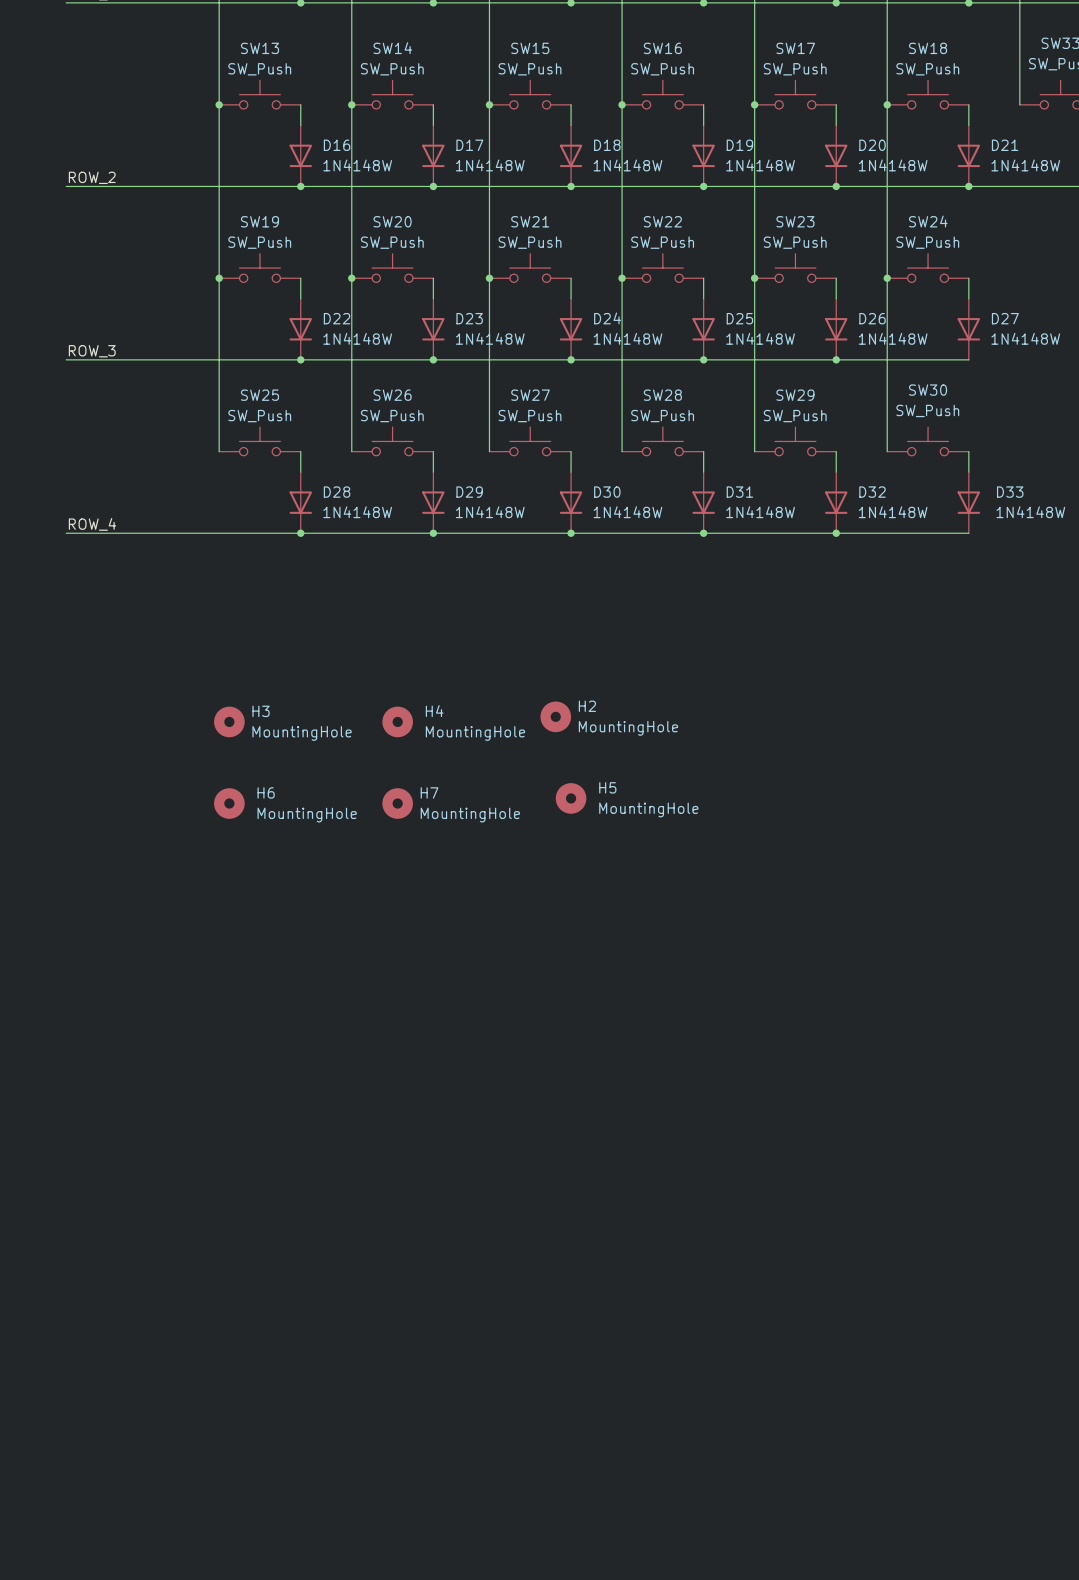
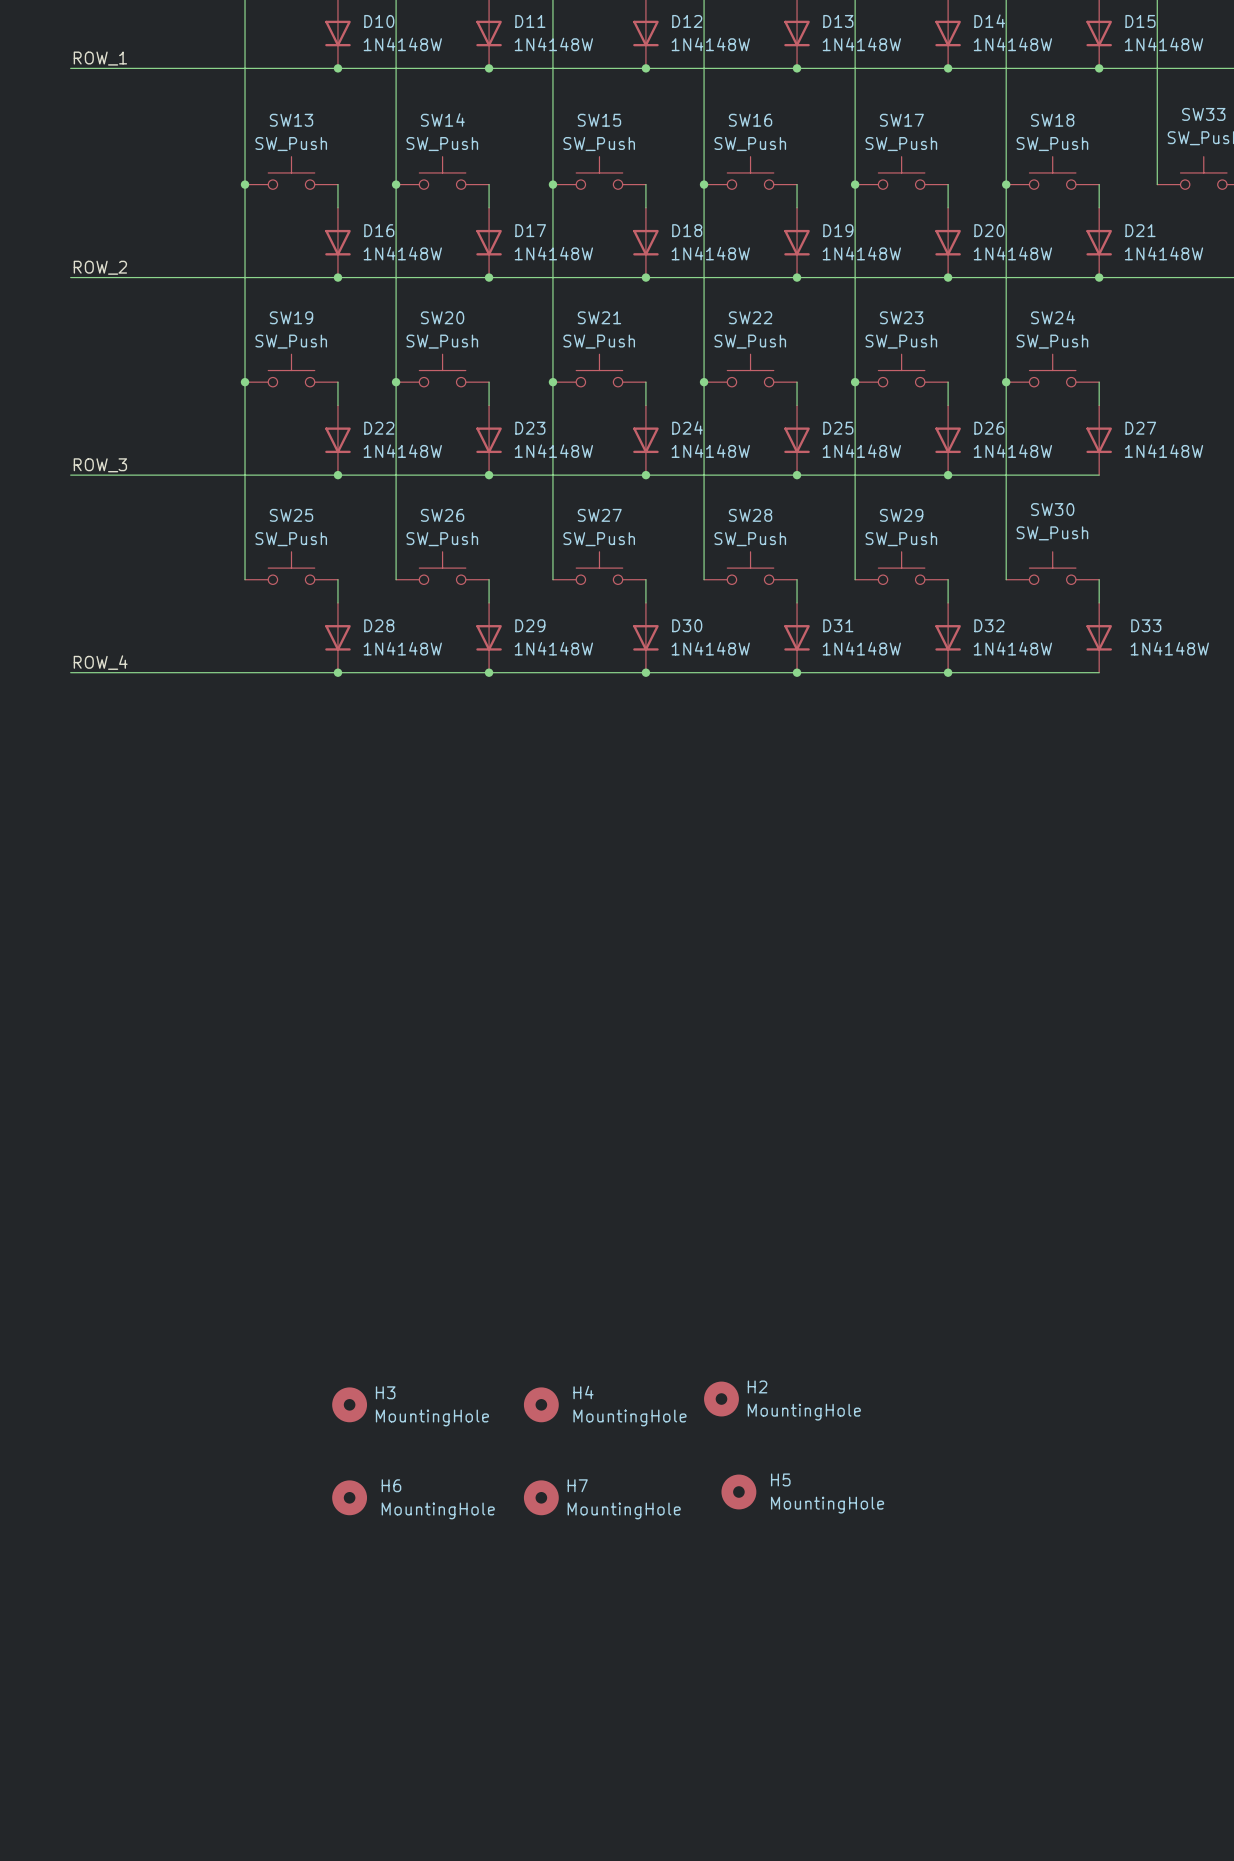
H2 position: (555, 716) -> (721, 1399)
H3 position: (229, 721) -> (349, 1404)
H4 position: (397, 721) -> (541, 1404)
H5 position: (571, 798) -> (738, 1491)
H6 position: (229, 803) -> (349, 1497)
H7 position: (397, 803) -> (541, 1497)

